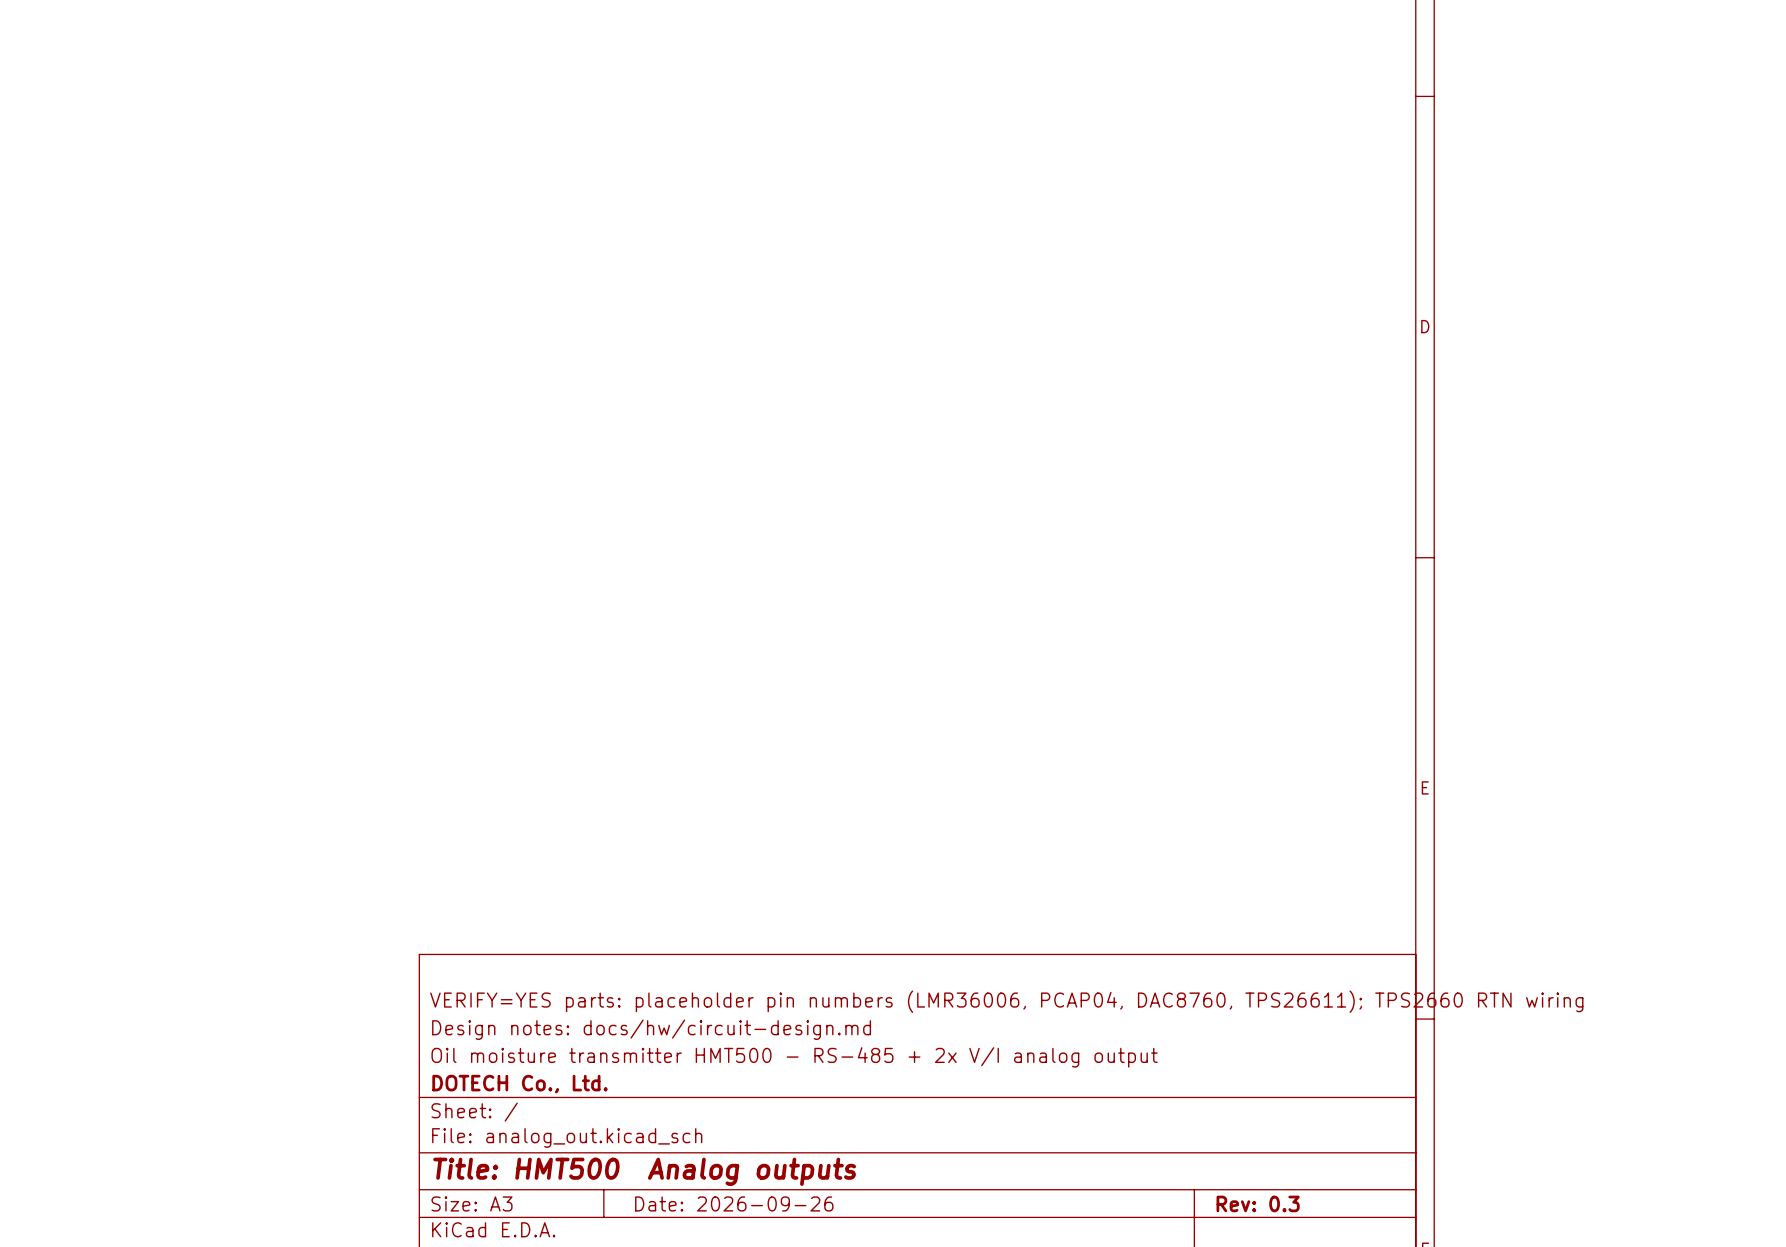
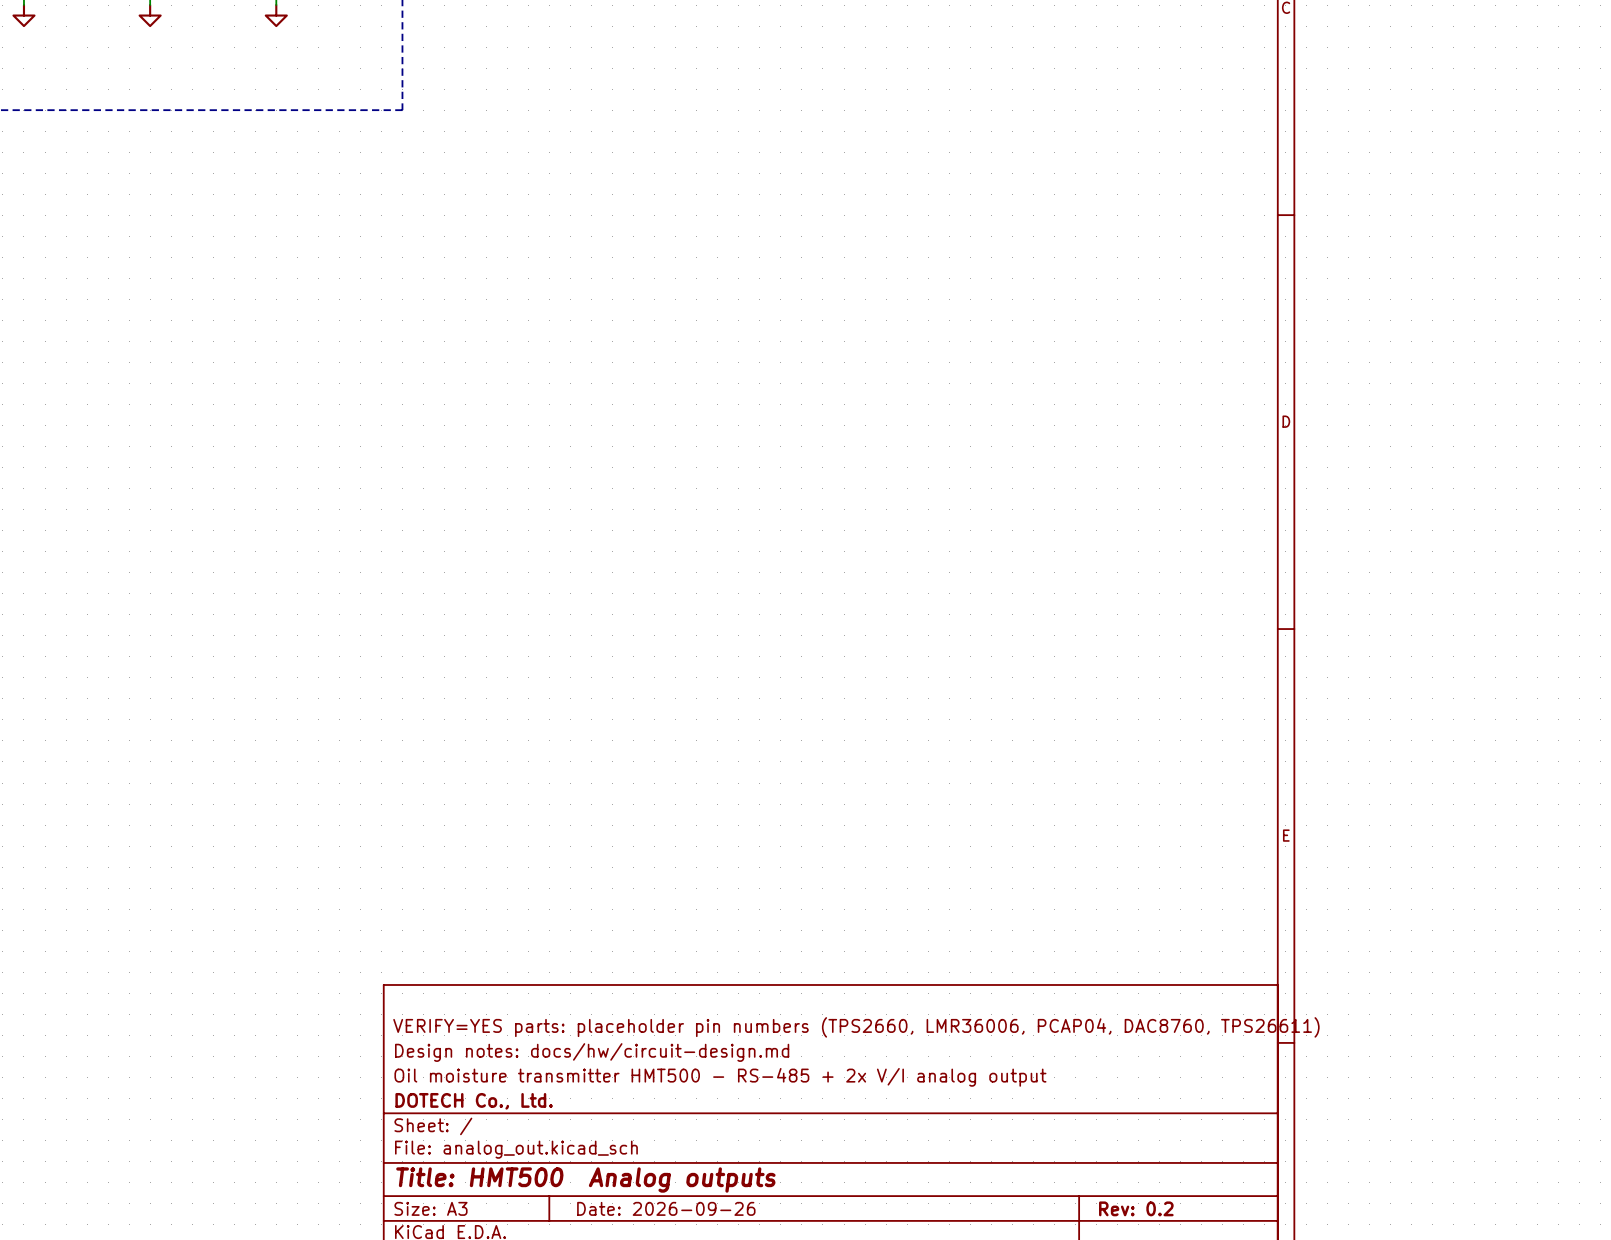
title block: VERIFY=YES parts: placeholder pin numbers (LMR36006, PCAP04, DAC8760, TPS26611); TPS2660 RTN wiring (1006, 1001) -> VERIFY=YES parts: placeholder pin numbers (TPS2660, LMR36006, PCAP04, DAC8760, TPS26611) (856, 1027)
title block: Rev: 0.3 (1258, 1203) -> Rev: 0.2 (1136, 1208)

